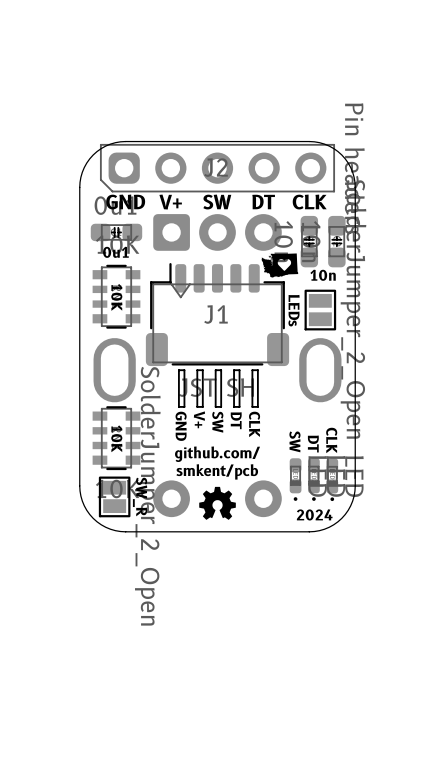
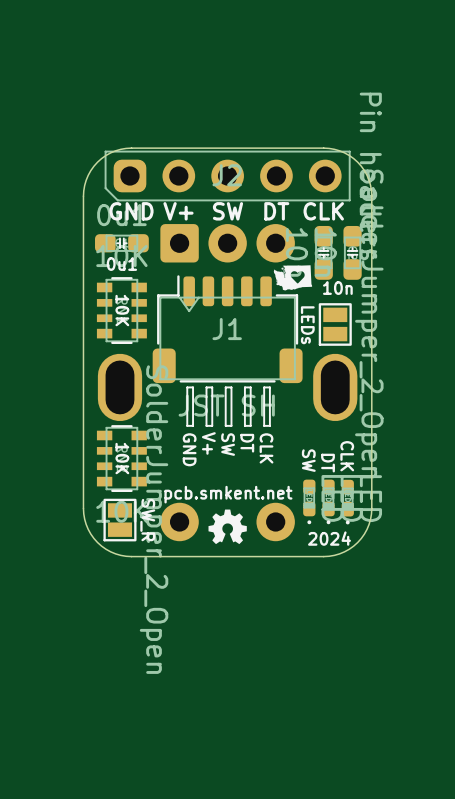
text: github.com/ (217, 454) -> none
text: smkent/pcb (217, 471) -> pcb.smkent.net (228, 494)

